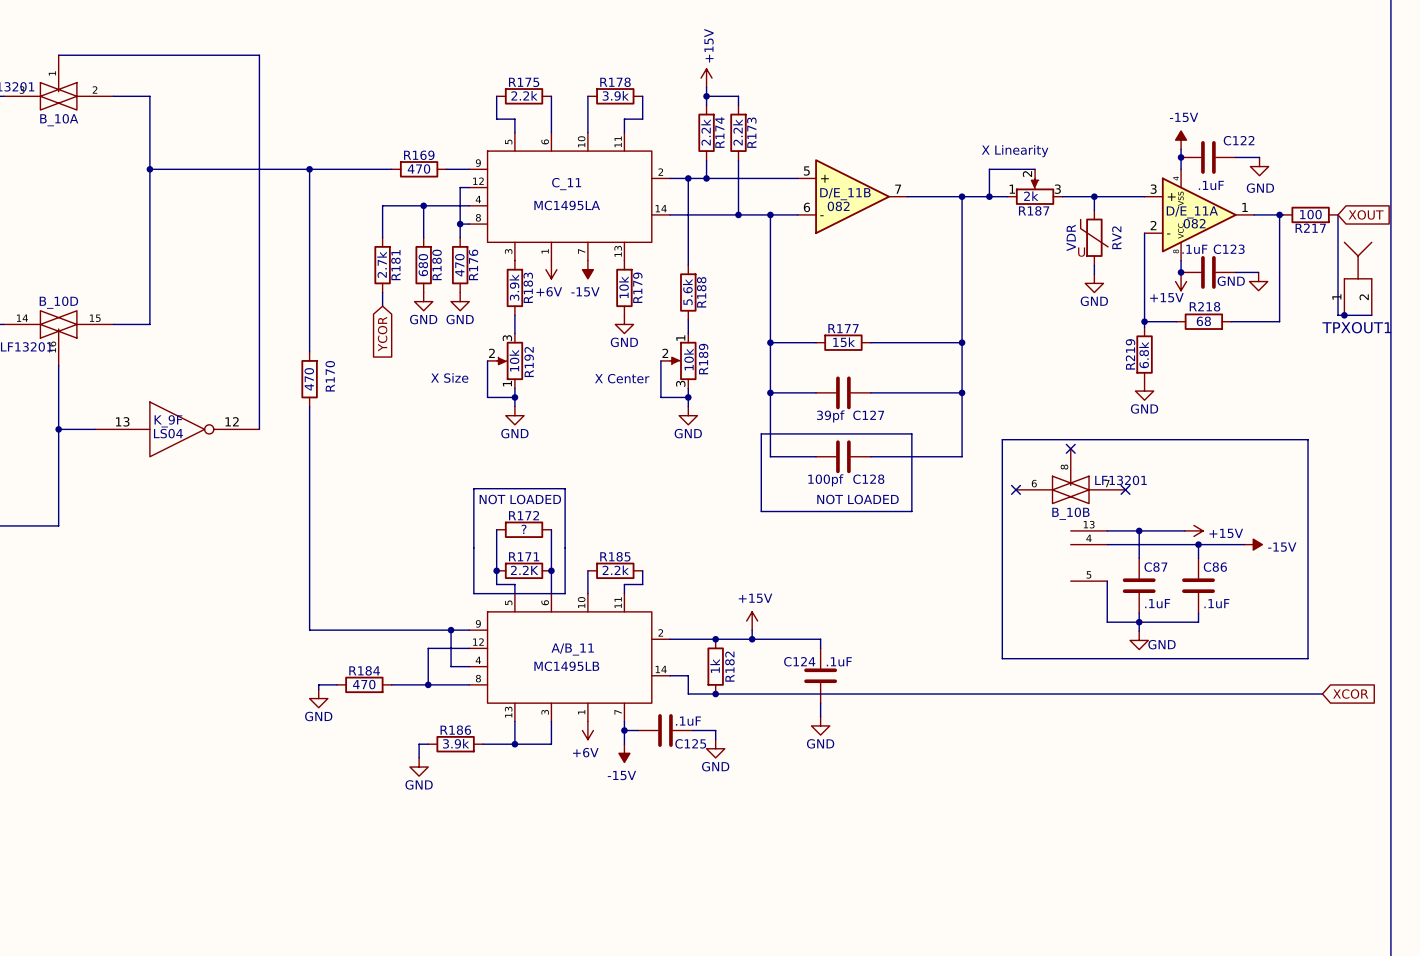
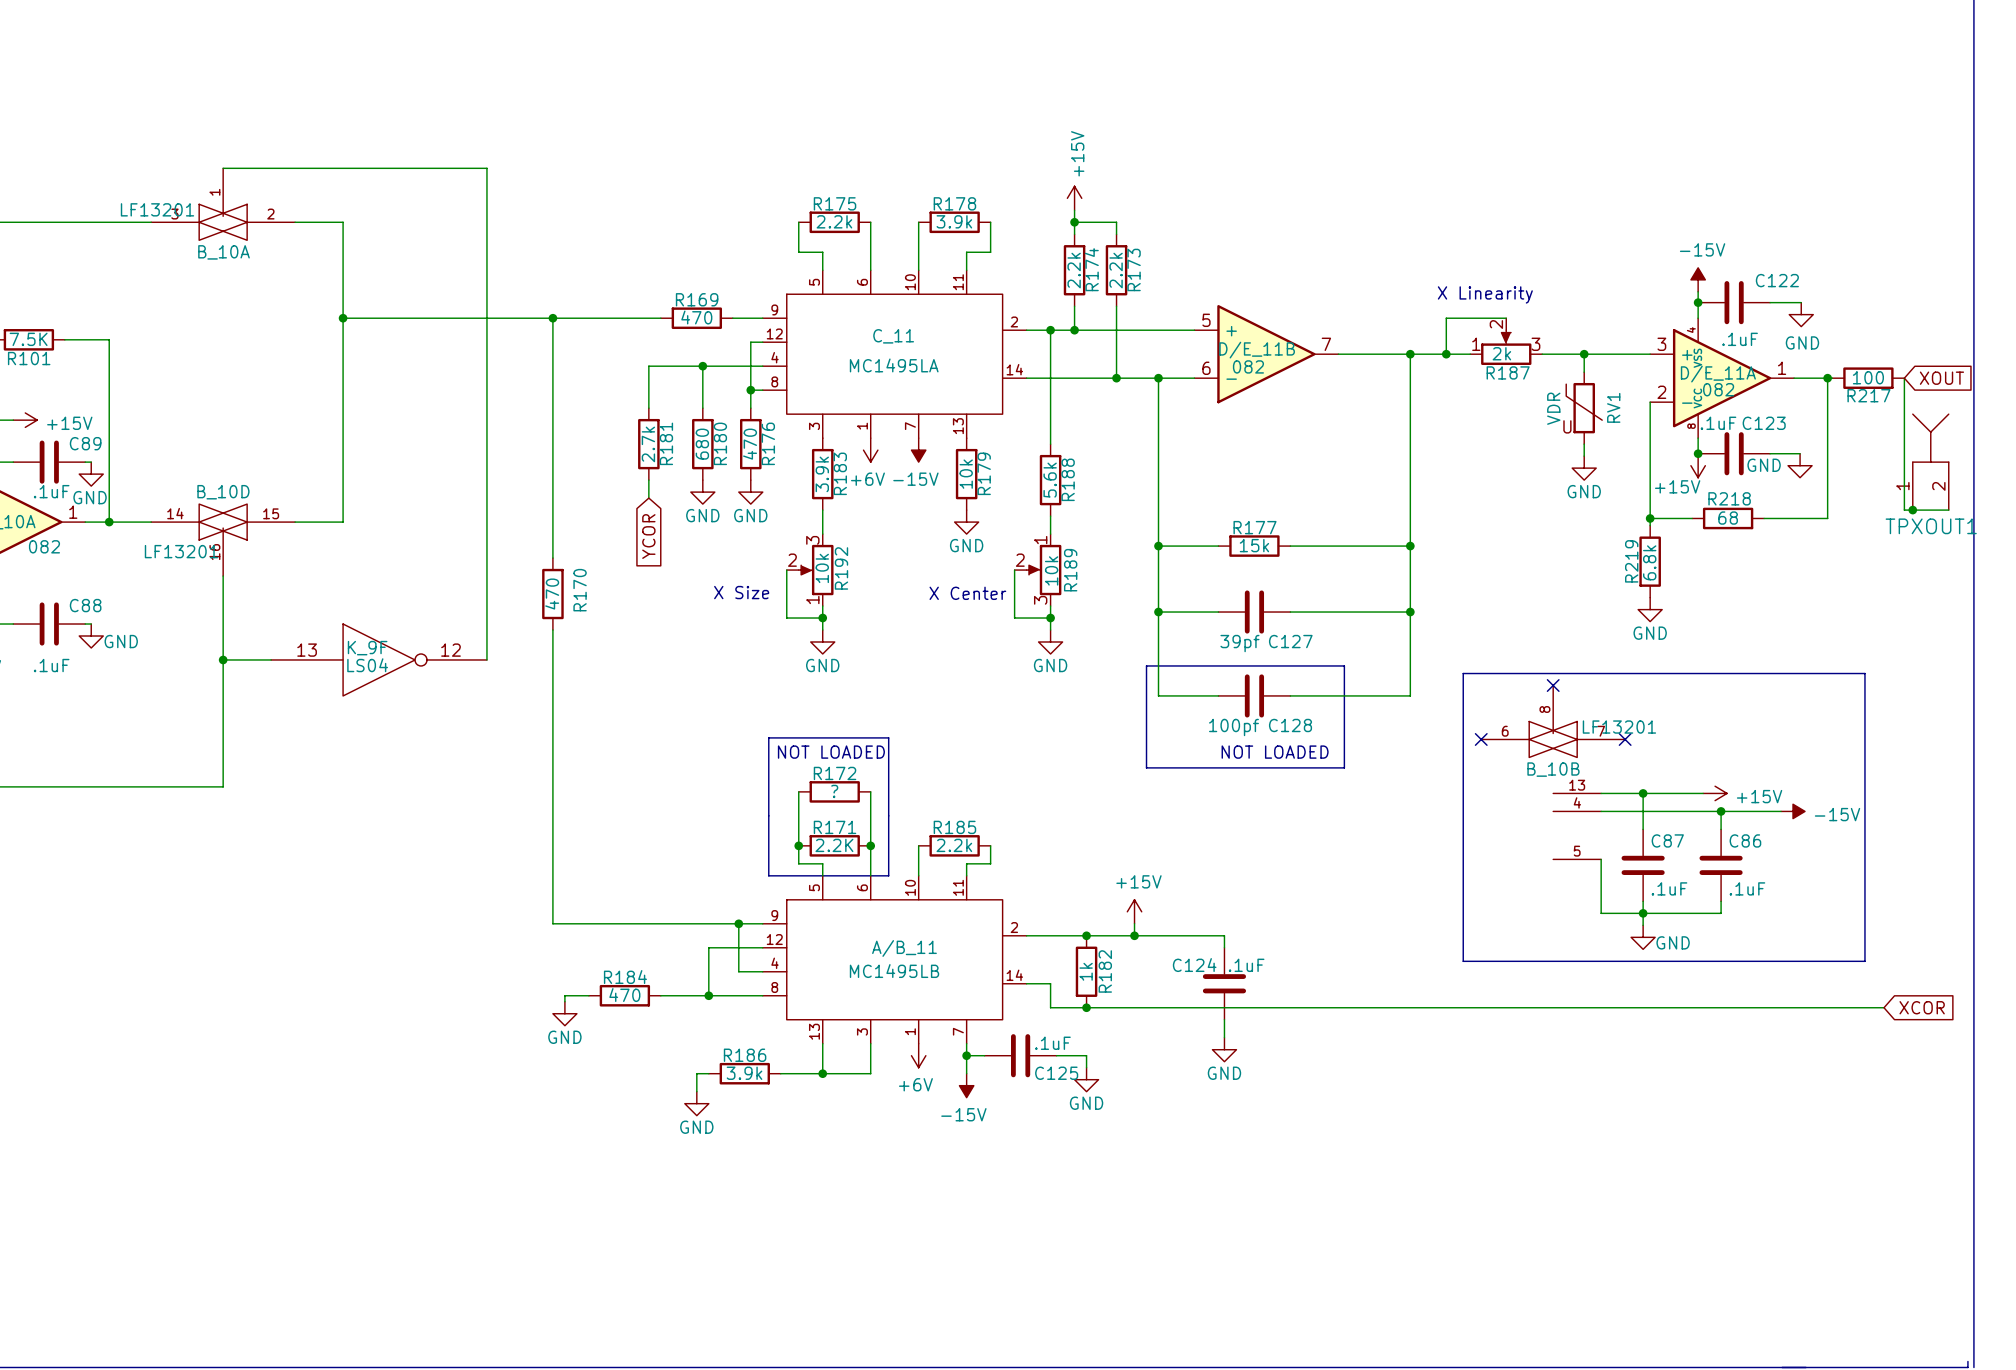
RV2 name: RV2 (1116, 237) -> RV1 (1613, 407)

